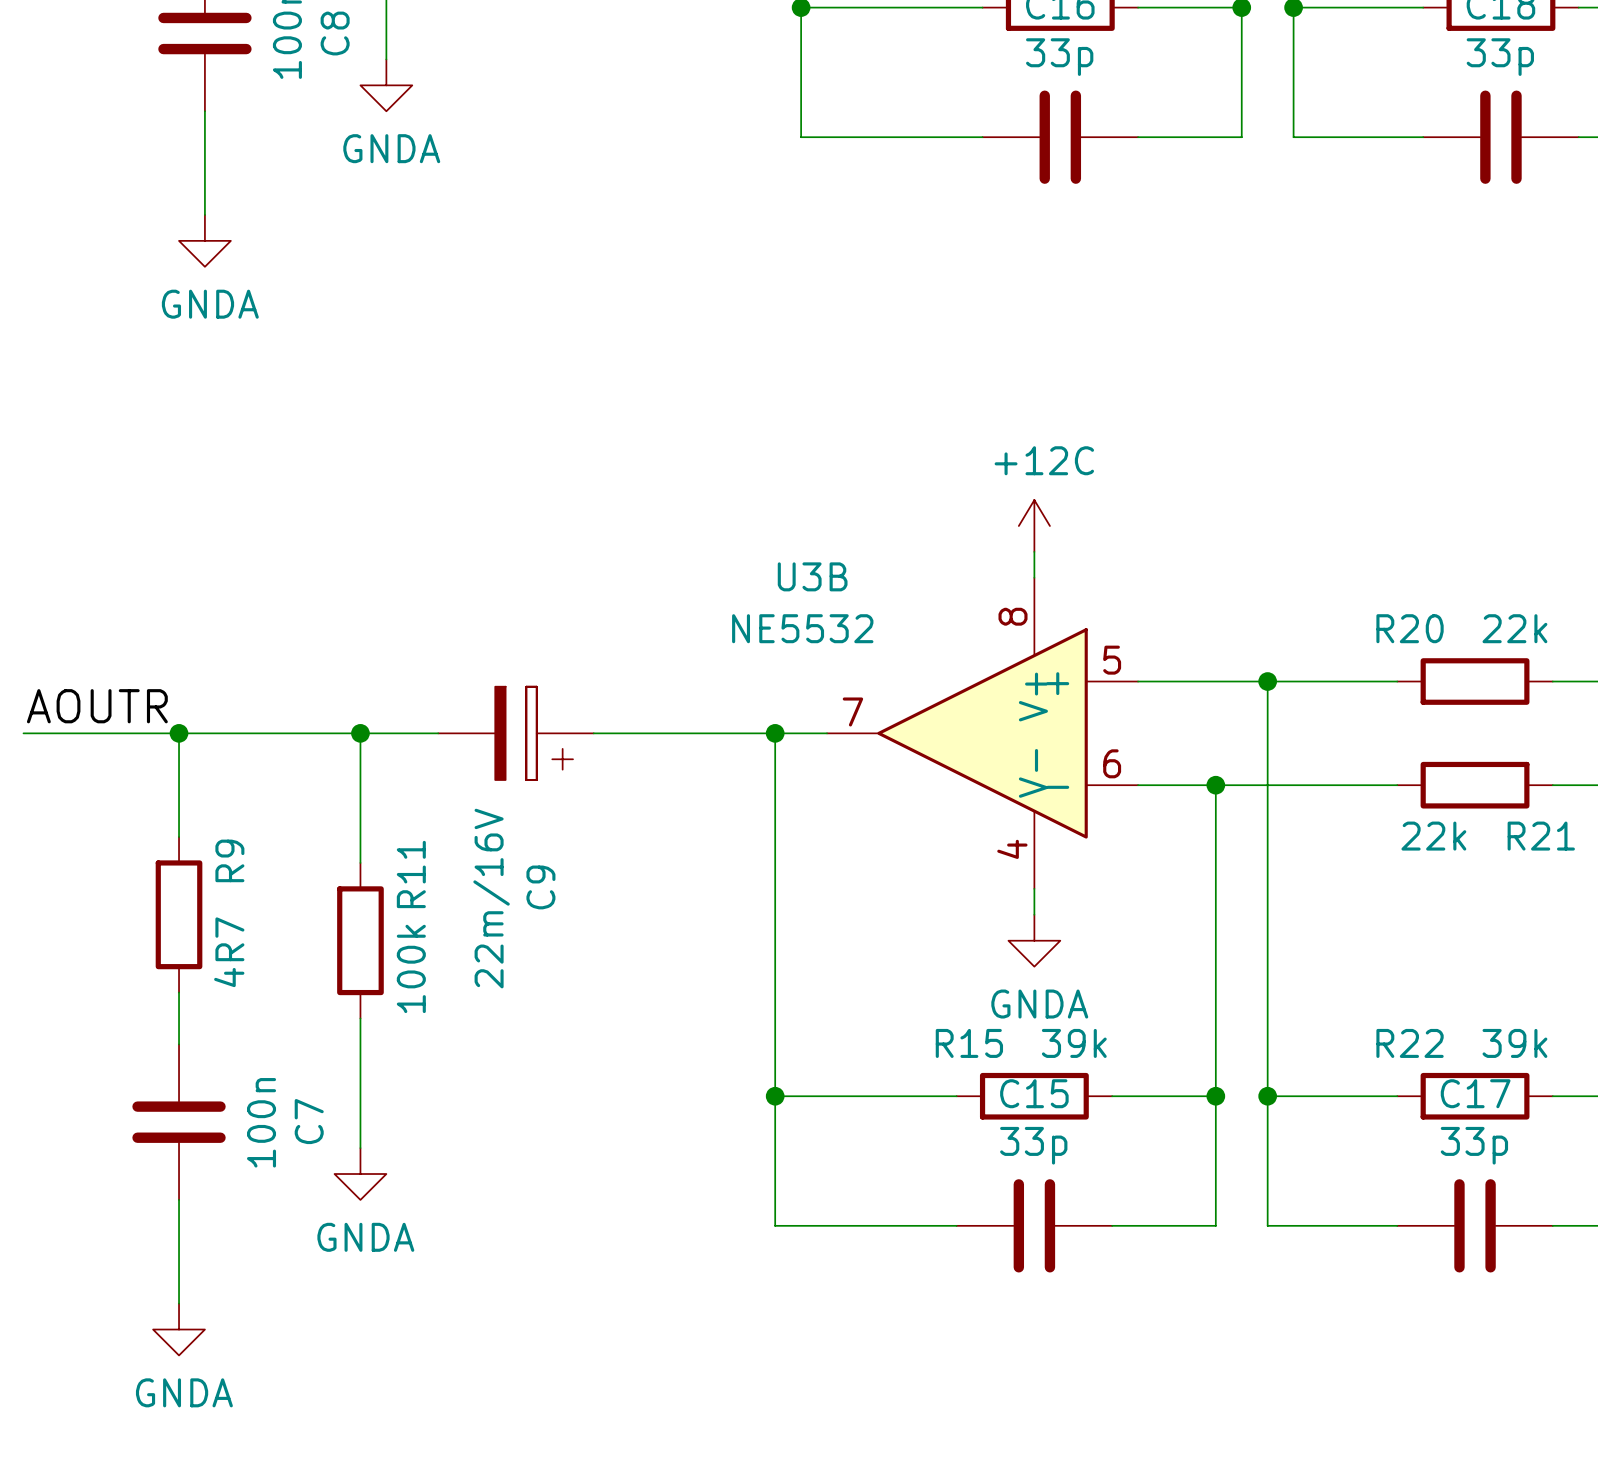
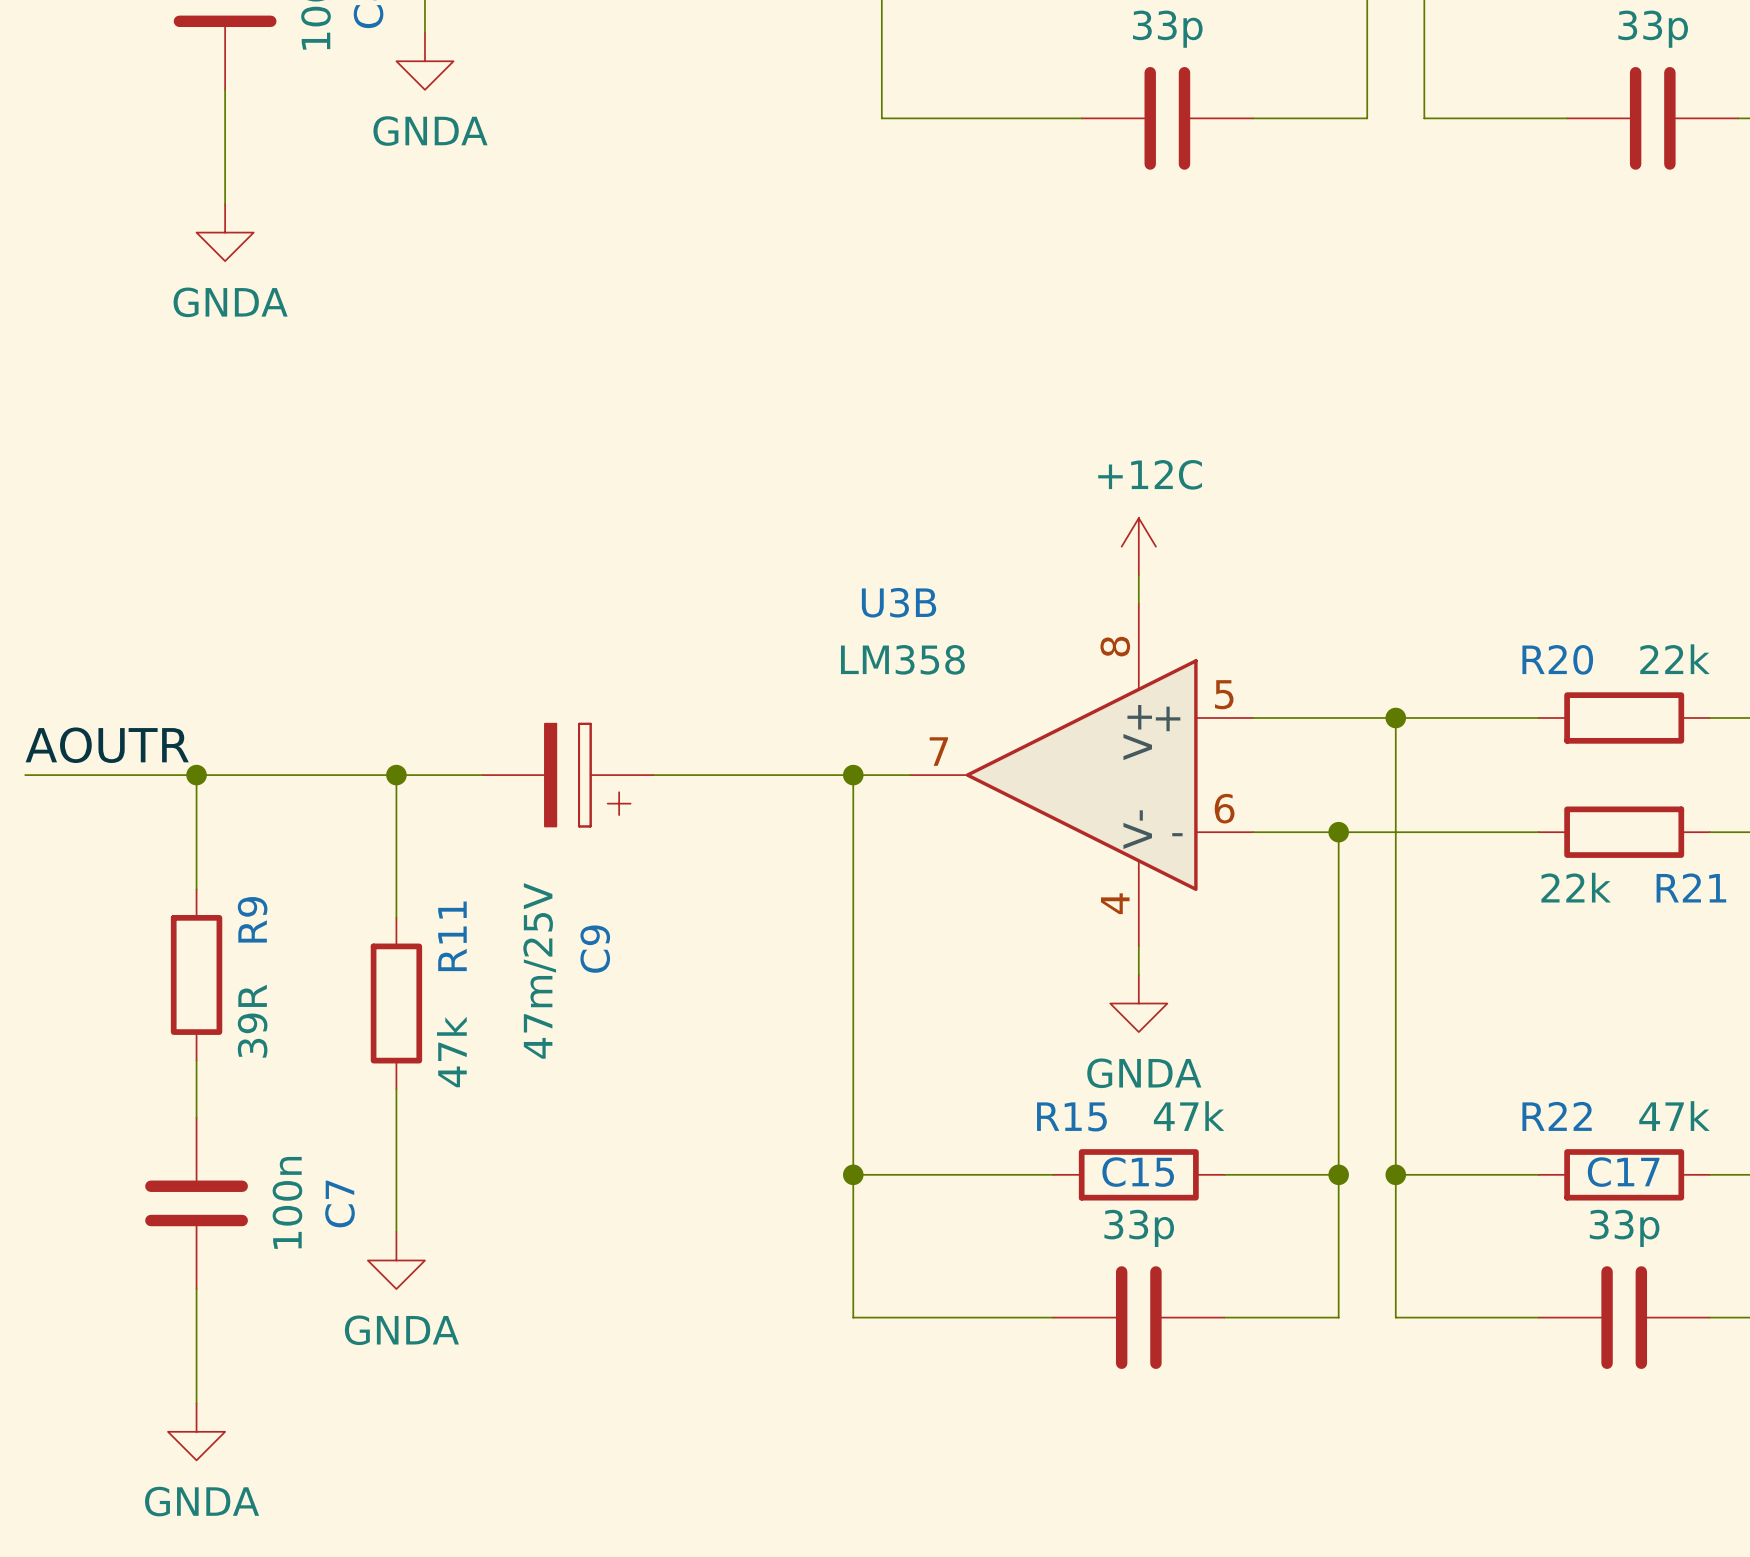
U3B value: NE5532 (802, 628) -> LM358 (902, 659)
C9 value: 22m/16V (491, 898) -> 47m/25V (539, 970)
R9 value: 4R7 (229, 952) -> 39R (252, 1021)
R11 value: 100k (411, 968) -> 47k (451, 1052)
R15 value: 39k (1074, 1043) -> 47k (1189, 1116)
R22 value: 39k (1514, 1043) -> 47k (1674, 1116)

